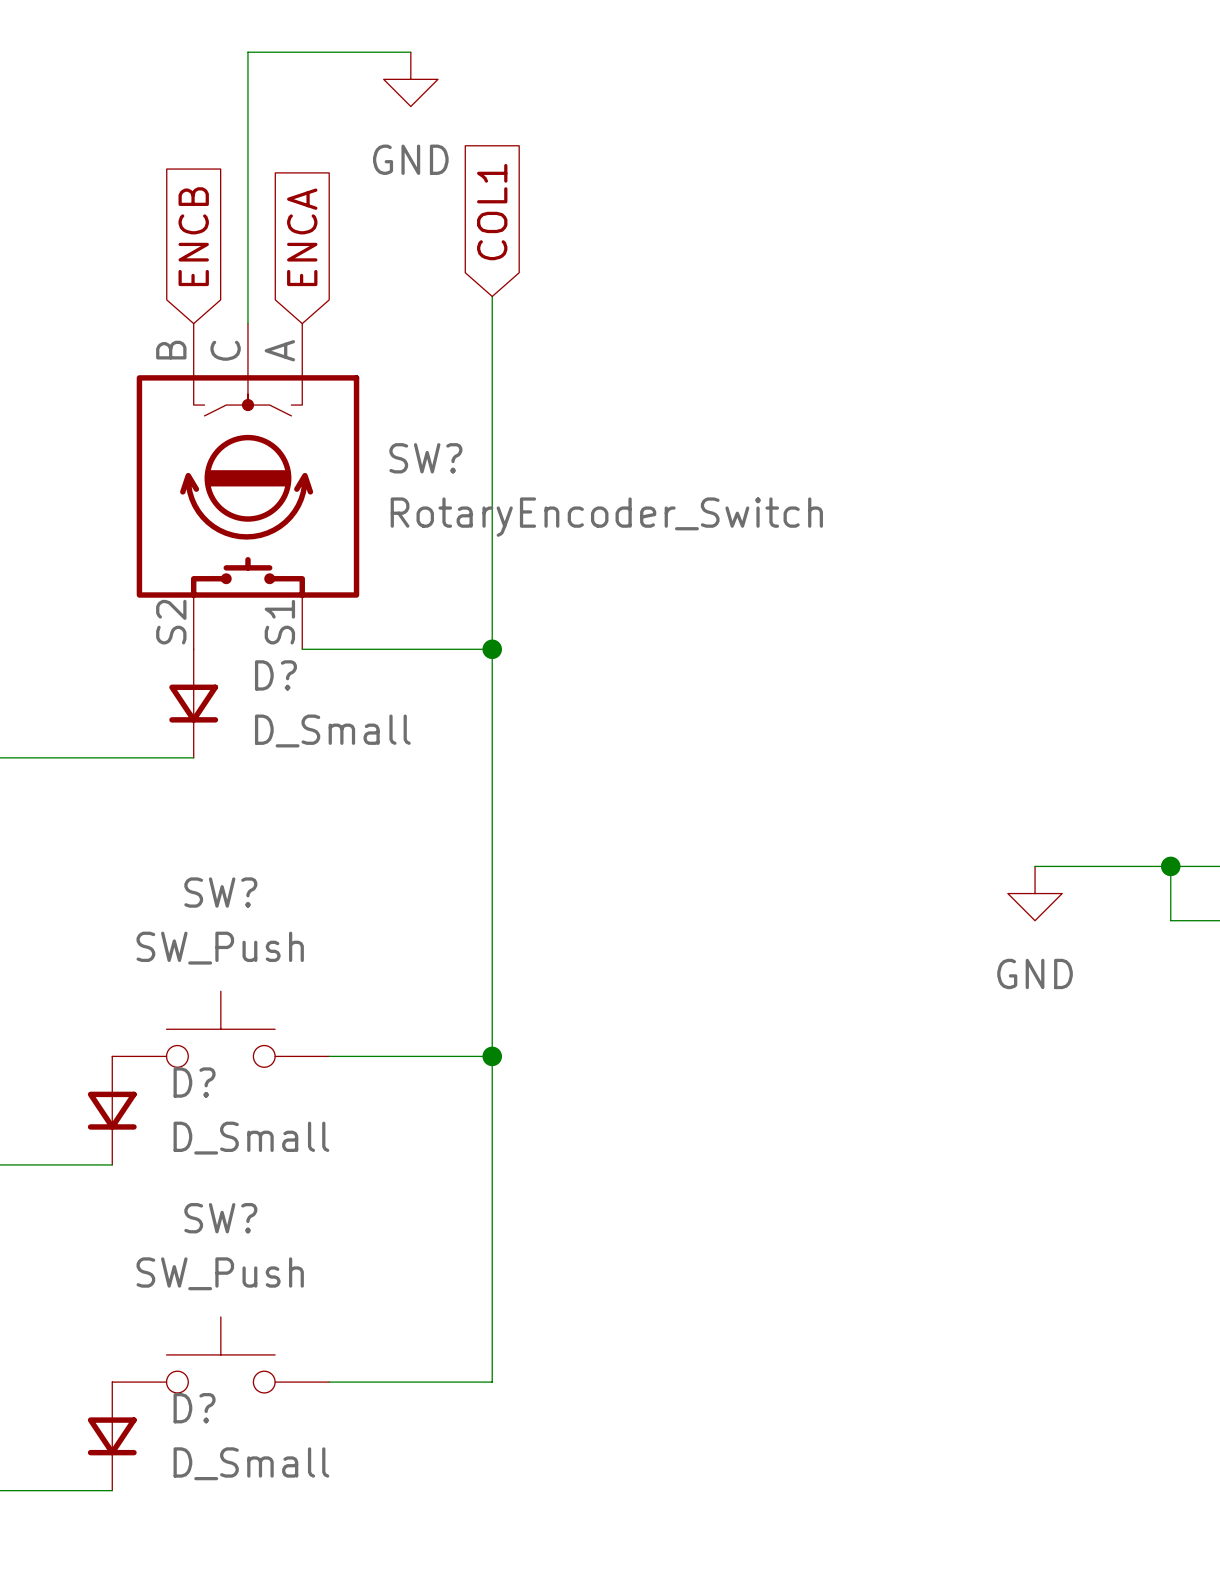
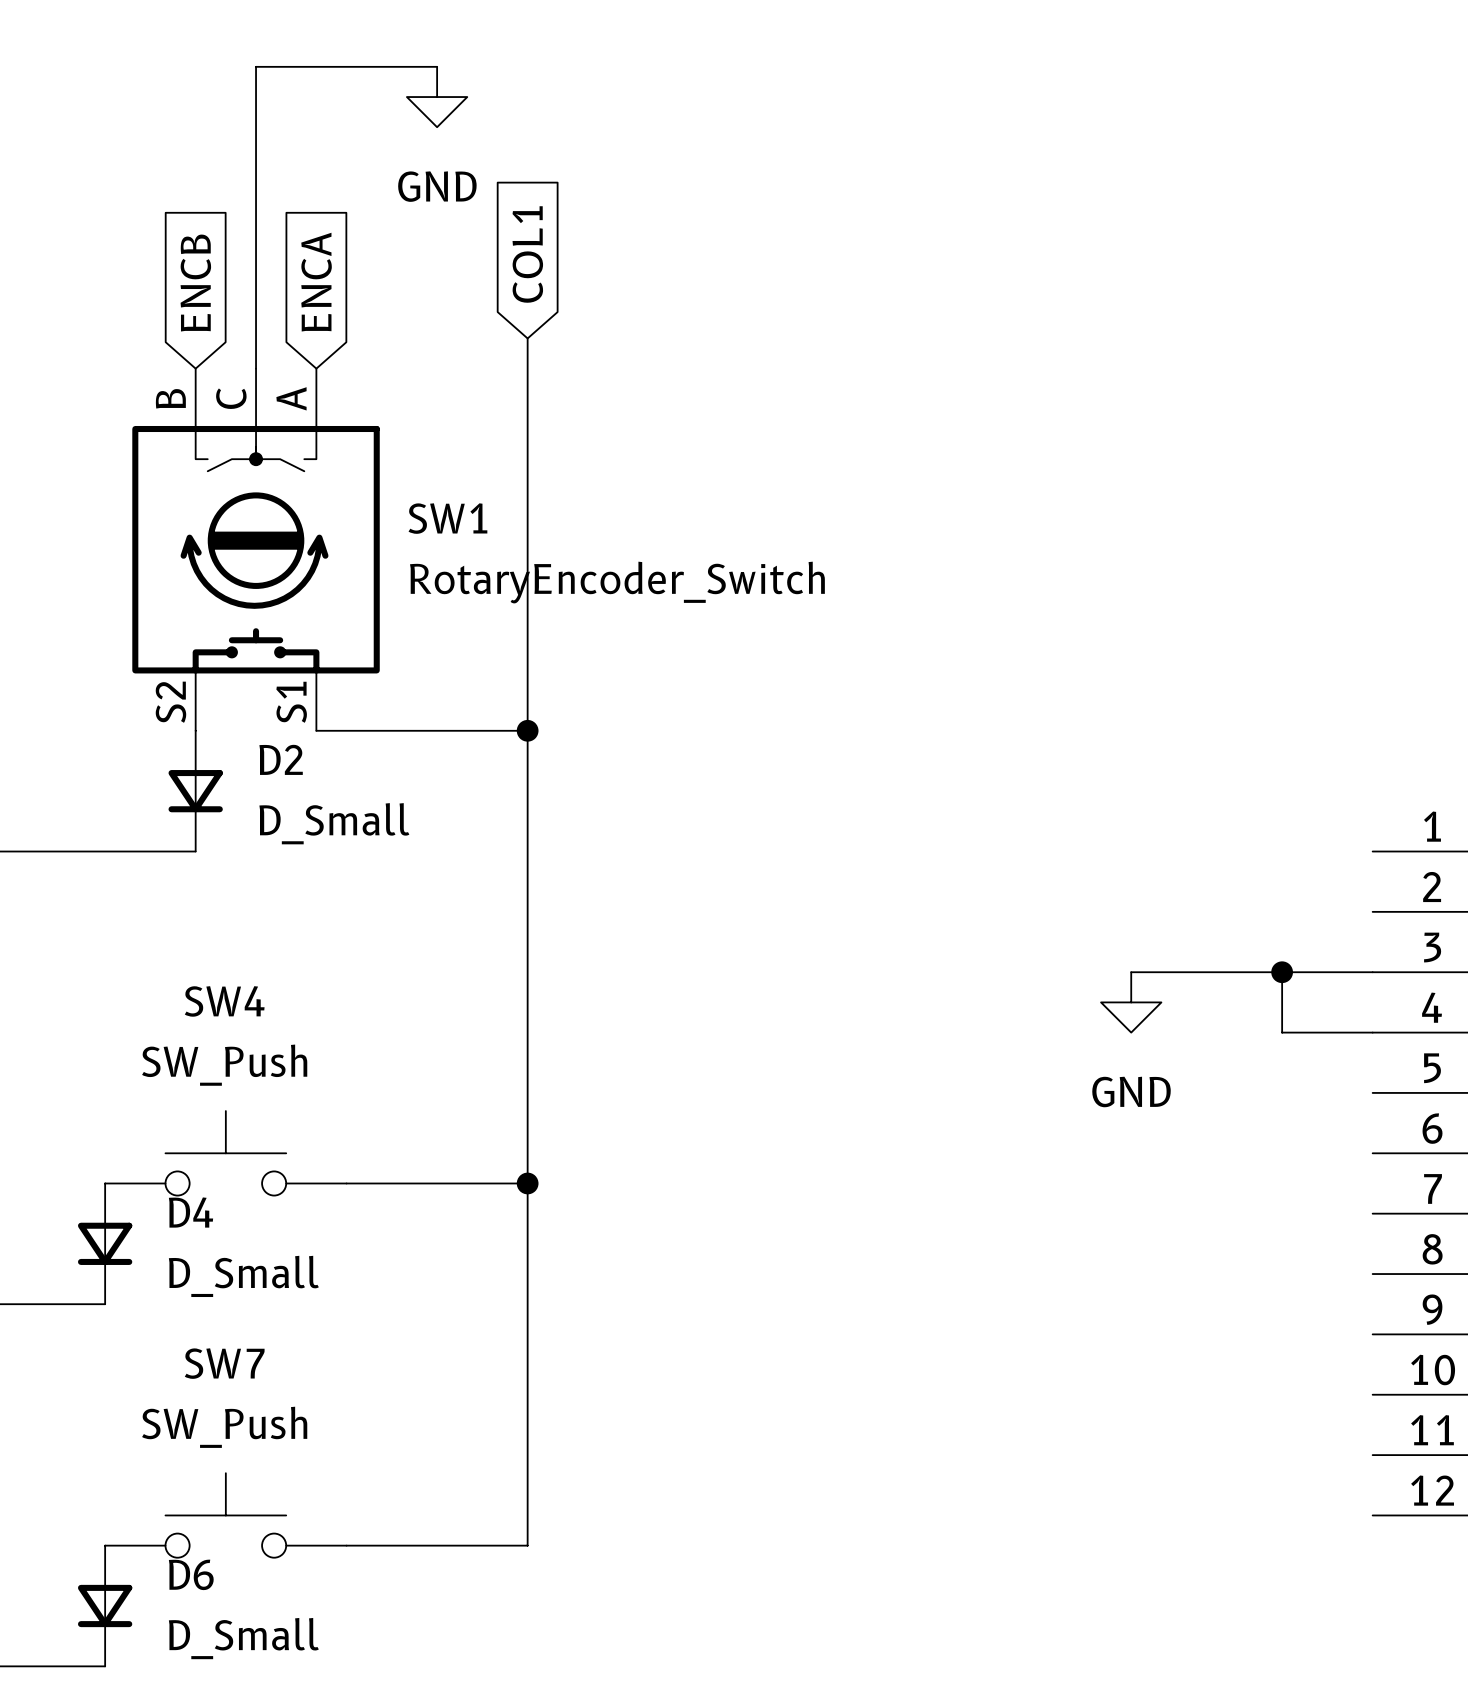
SW? name: SW? (425, 458) -> SW1 (447, 518)
D? name: D? (275, 675) -> D2 (281, 759)
SW? name: SW? (220, 892) -> SW4 (224, 1001)
D? name: D? (194, 1082) -> D4 (191, 1212)
SW? name: SW? (220, 1218) -> SW7 (224, 1363)
D? name: D? (194, 1408) -> D6 (191, 1574)

